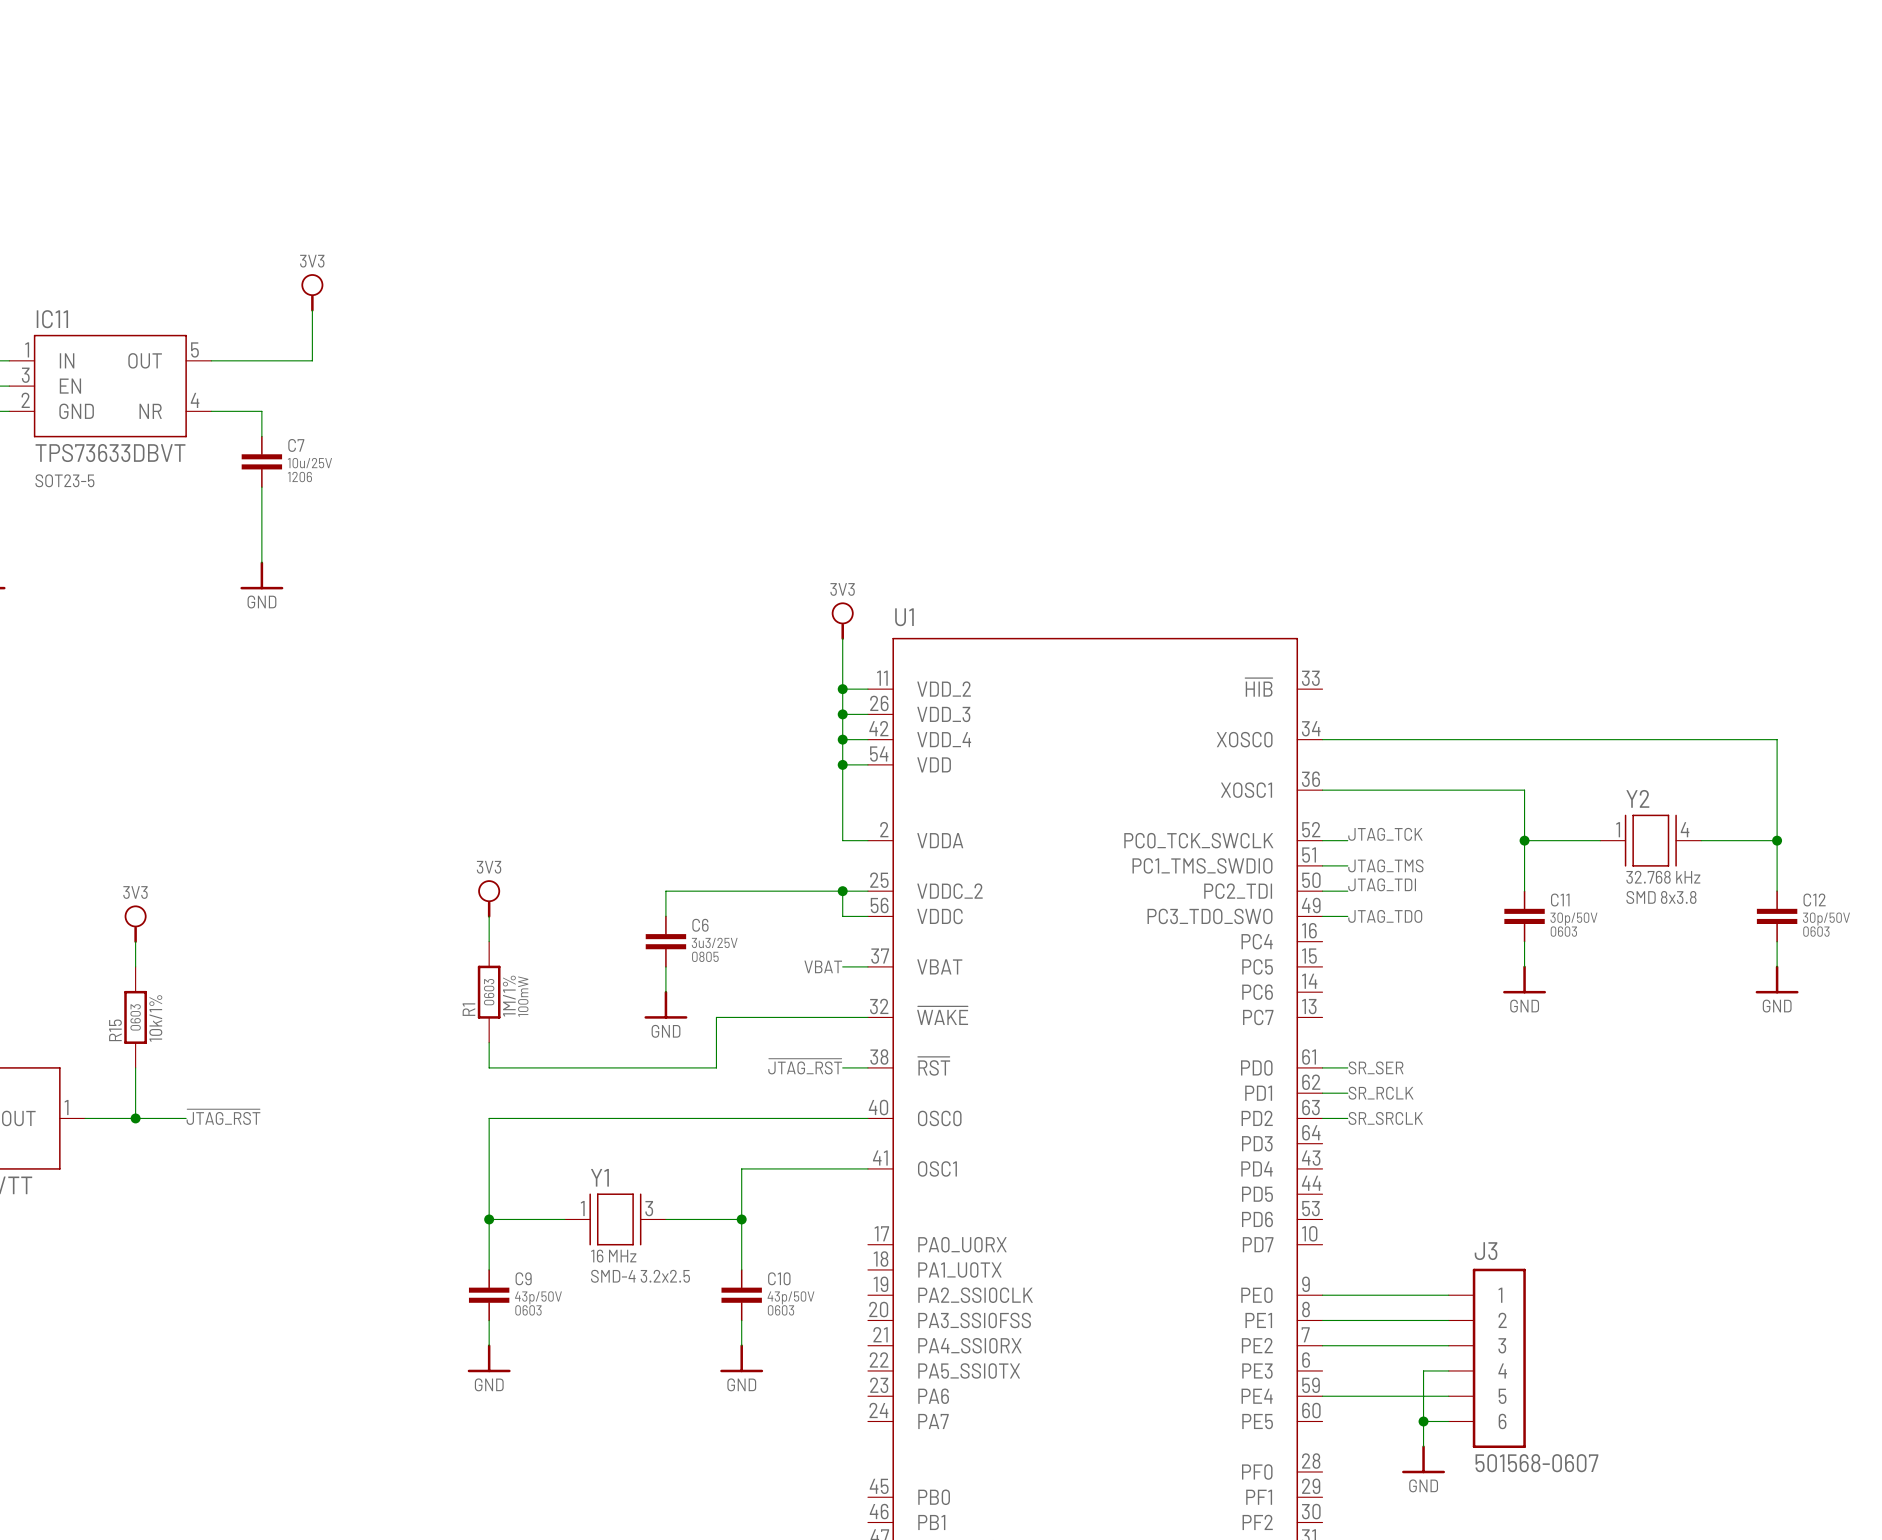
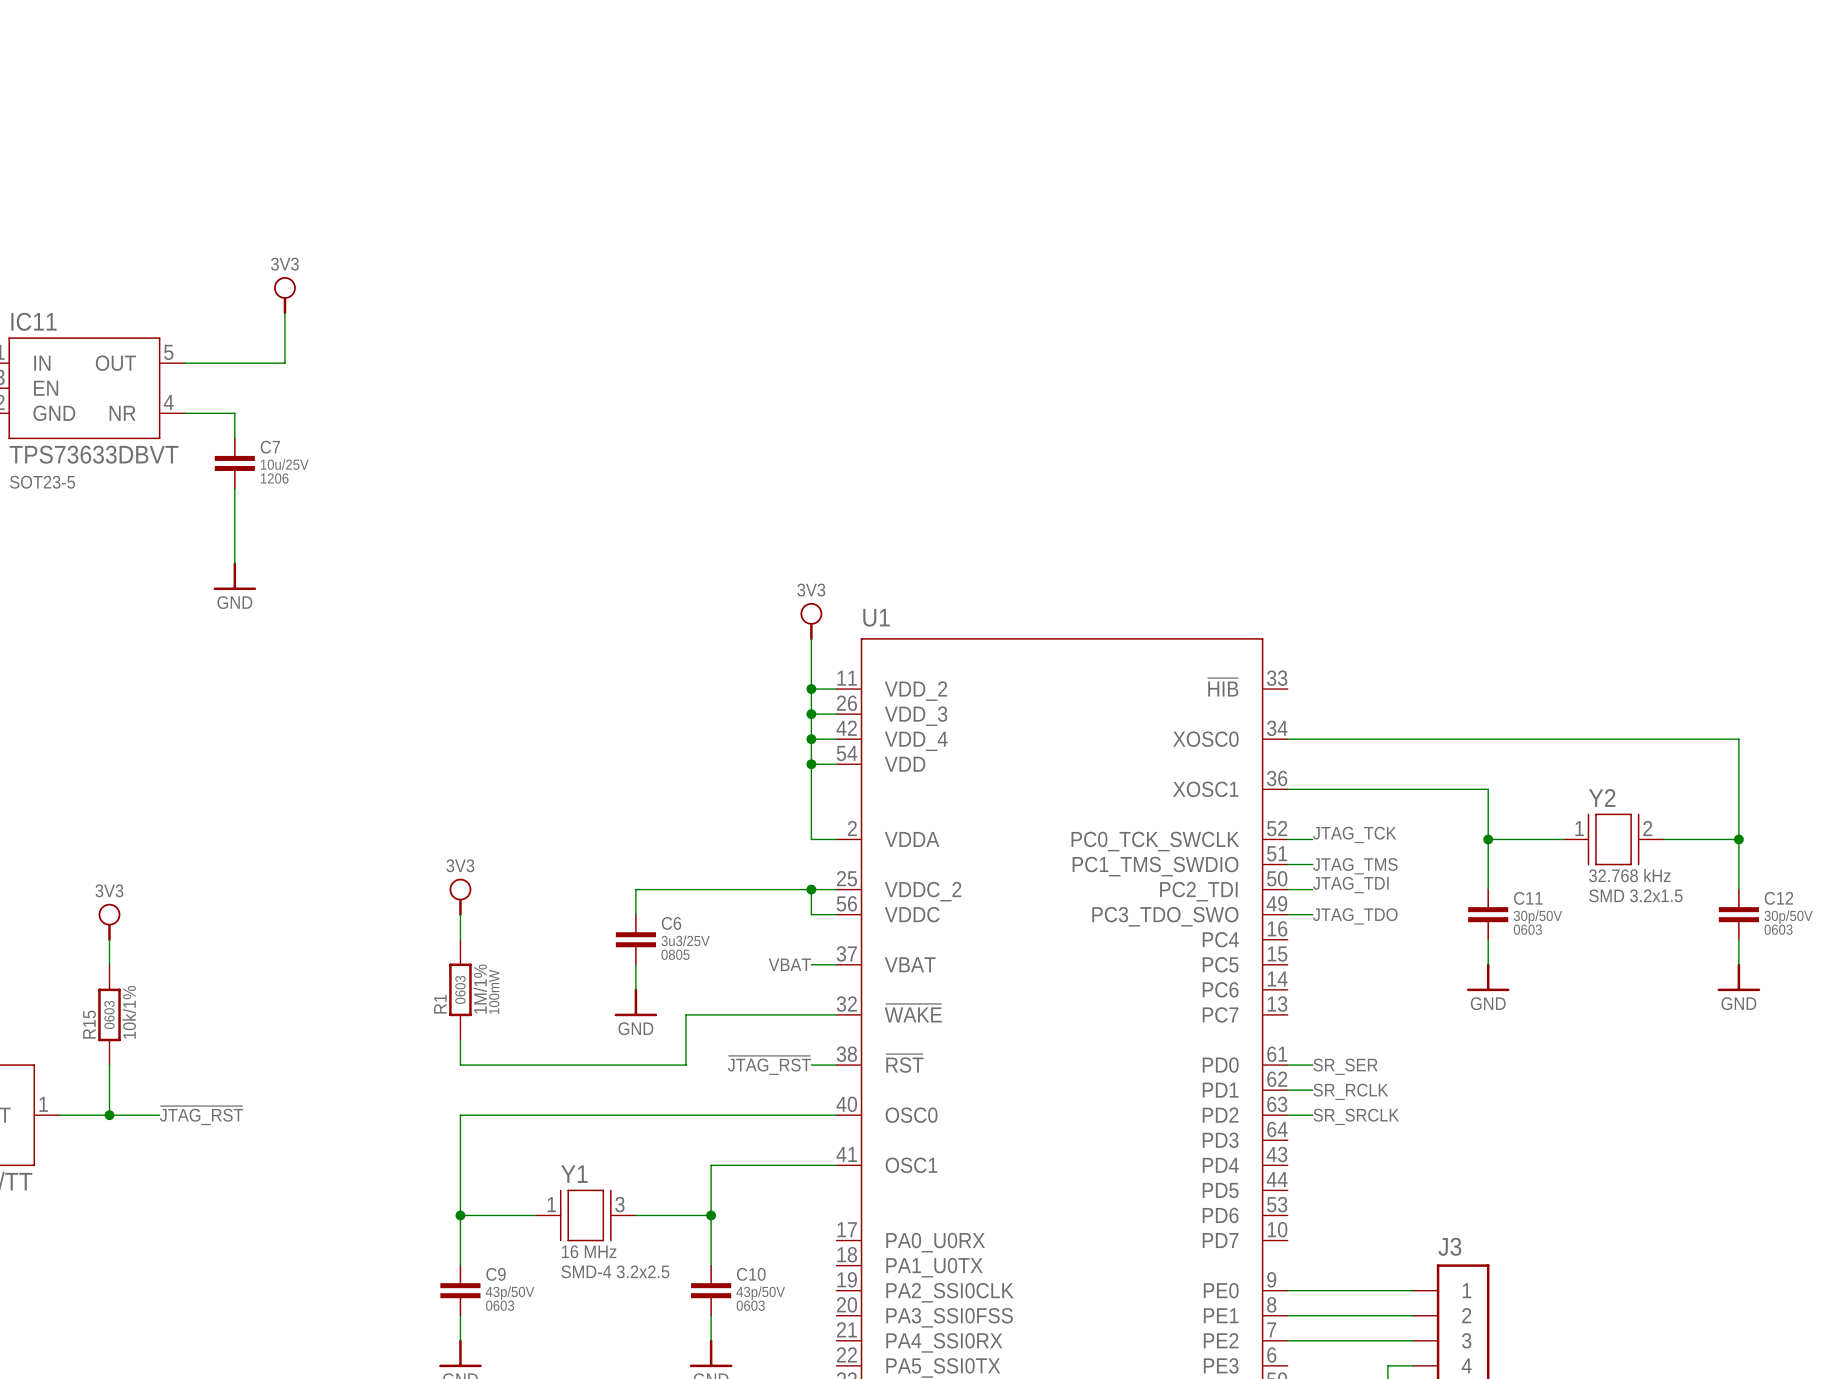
Y2 pin number: 4 (1685, 829) -> 2 (1647, 828)
Y2 text: SMD 8x3.8 (1661, 897) -> SMD 3.2x1.5 (1635, 895)

